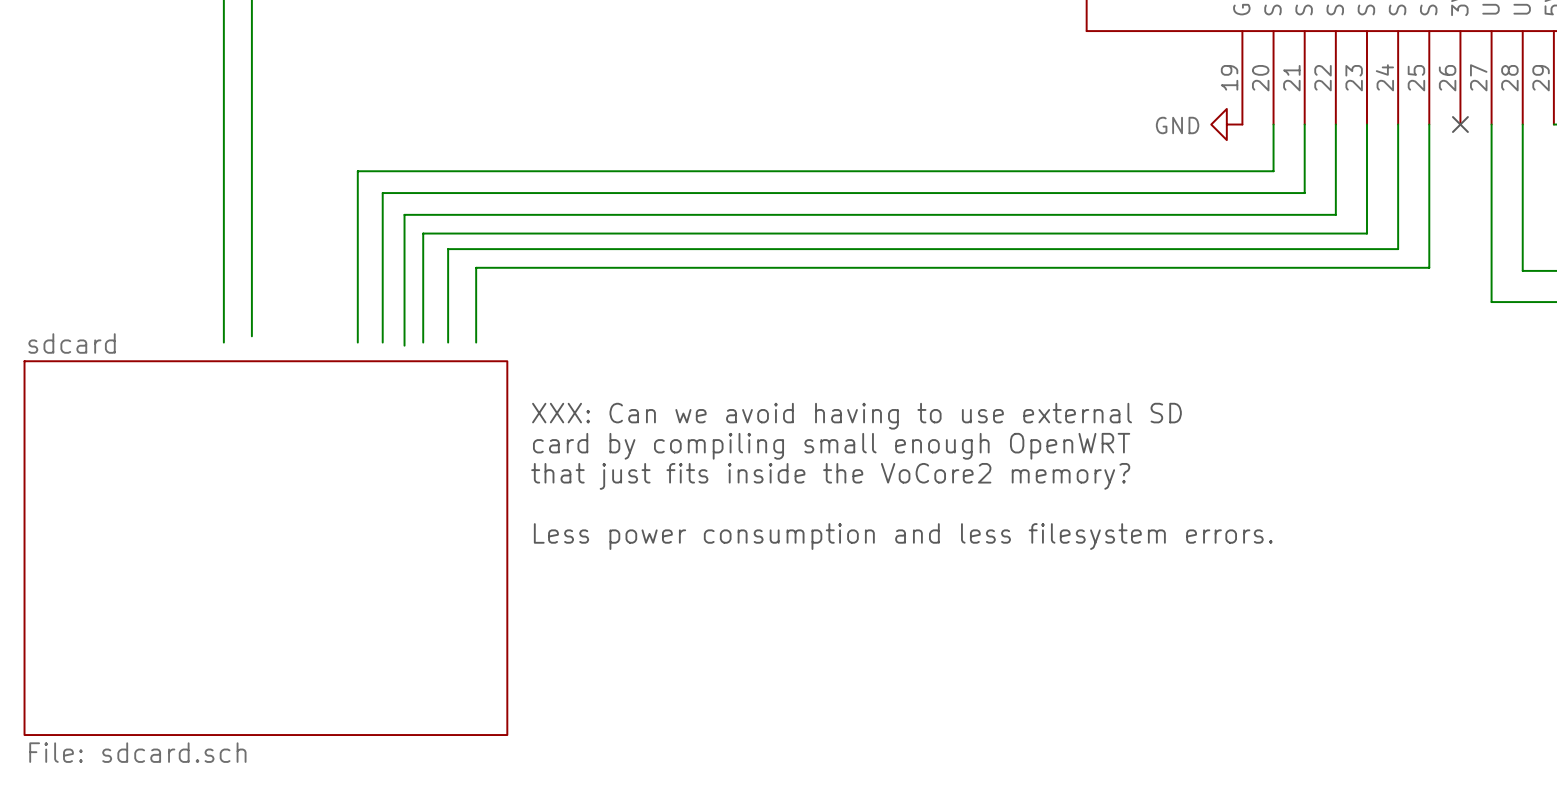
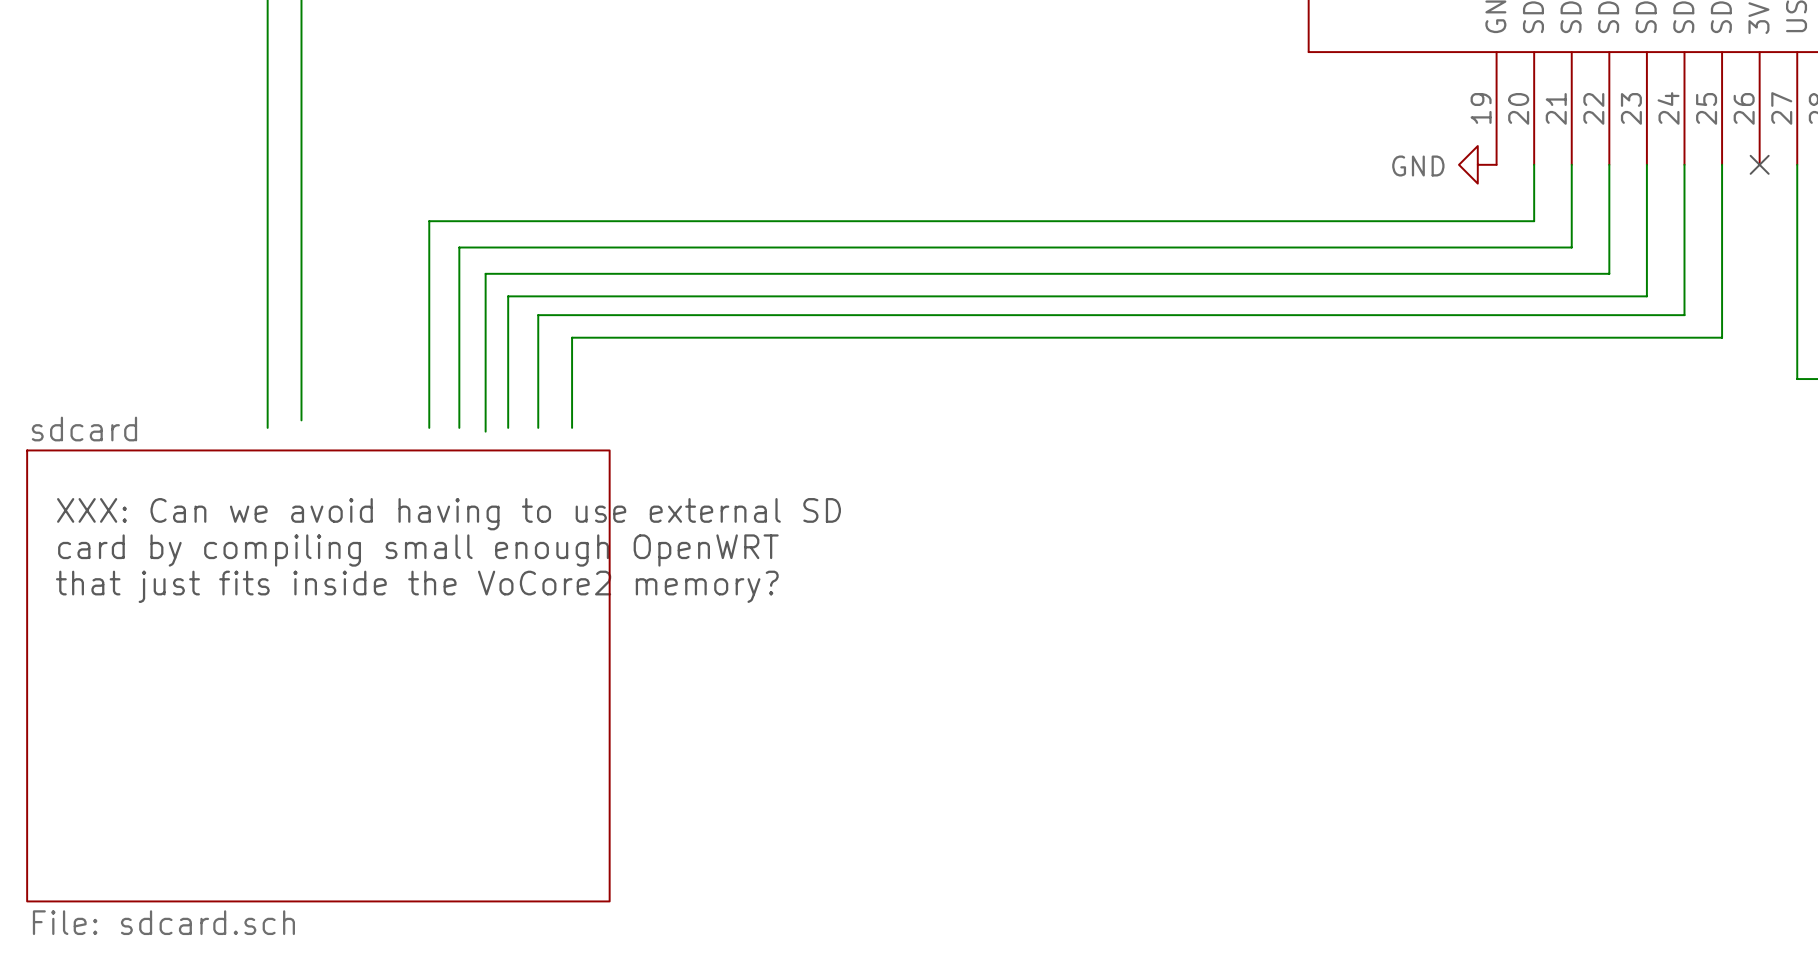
text: none -> XXX: Can we avoid having to use external SD (449, 514)
text: XXX: Can we avoid having to use external SD (856, 416) -> none
text: none -> card by compiling small enough OpenWRT (418, 550)
text: card by compiling small enough OpenWRT (831, 446) -> none
text: none -> that just fits inside the VoCore2 memory? (417, 586)
text: that just fits inside the VoCore2 memory? (830, 476) -> none
text: Less power consumption and less filesystem errors. (903, 536) -> none

